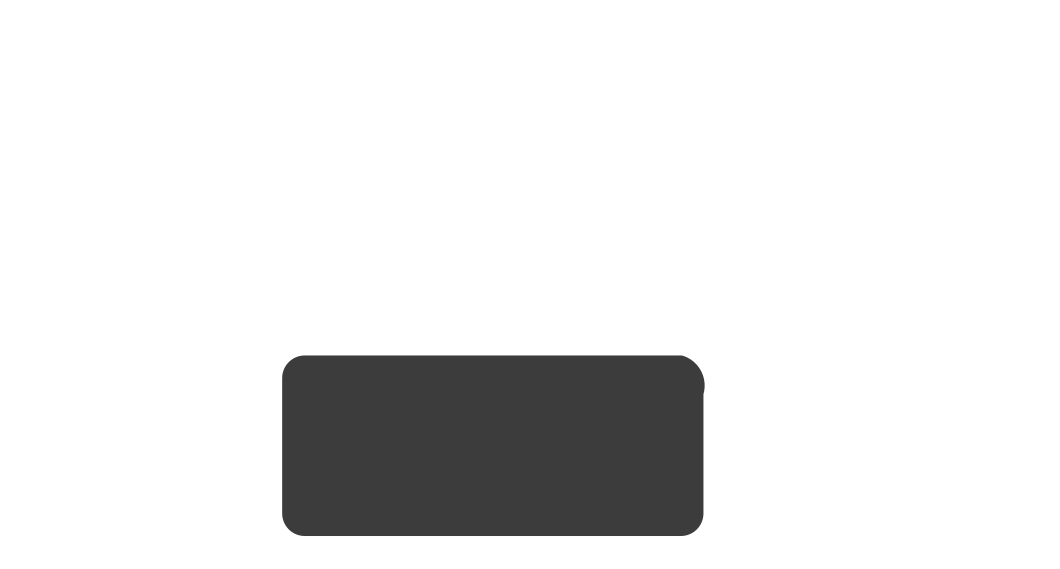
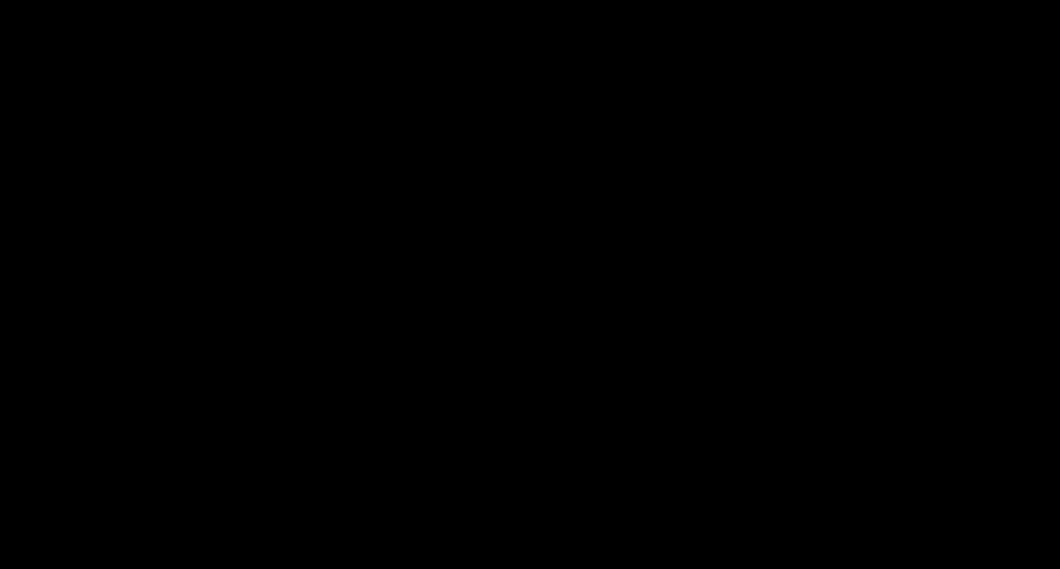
drawing: [282, 355, 705, 537] -> none

